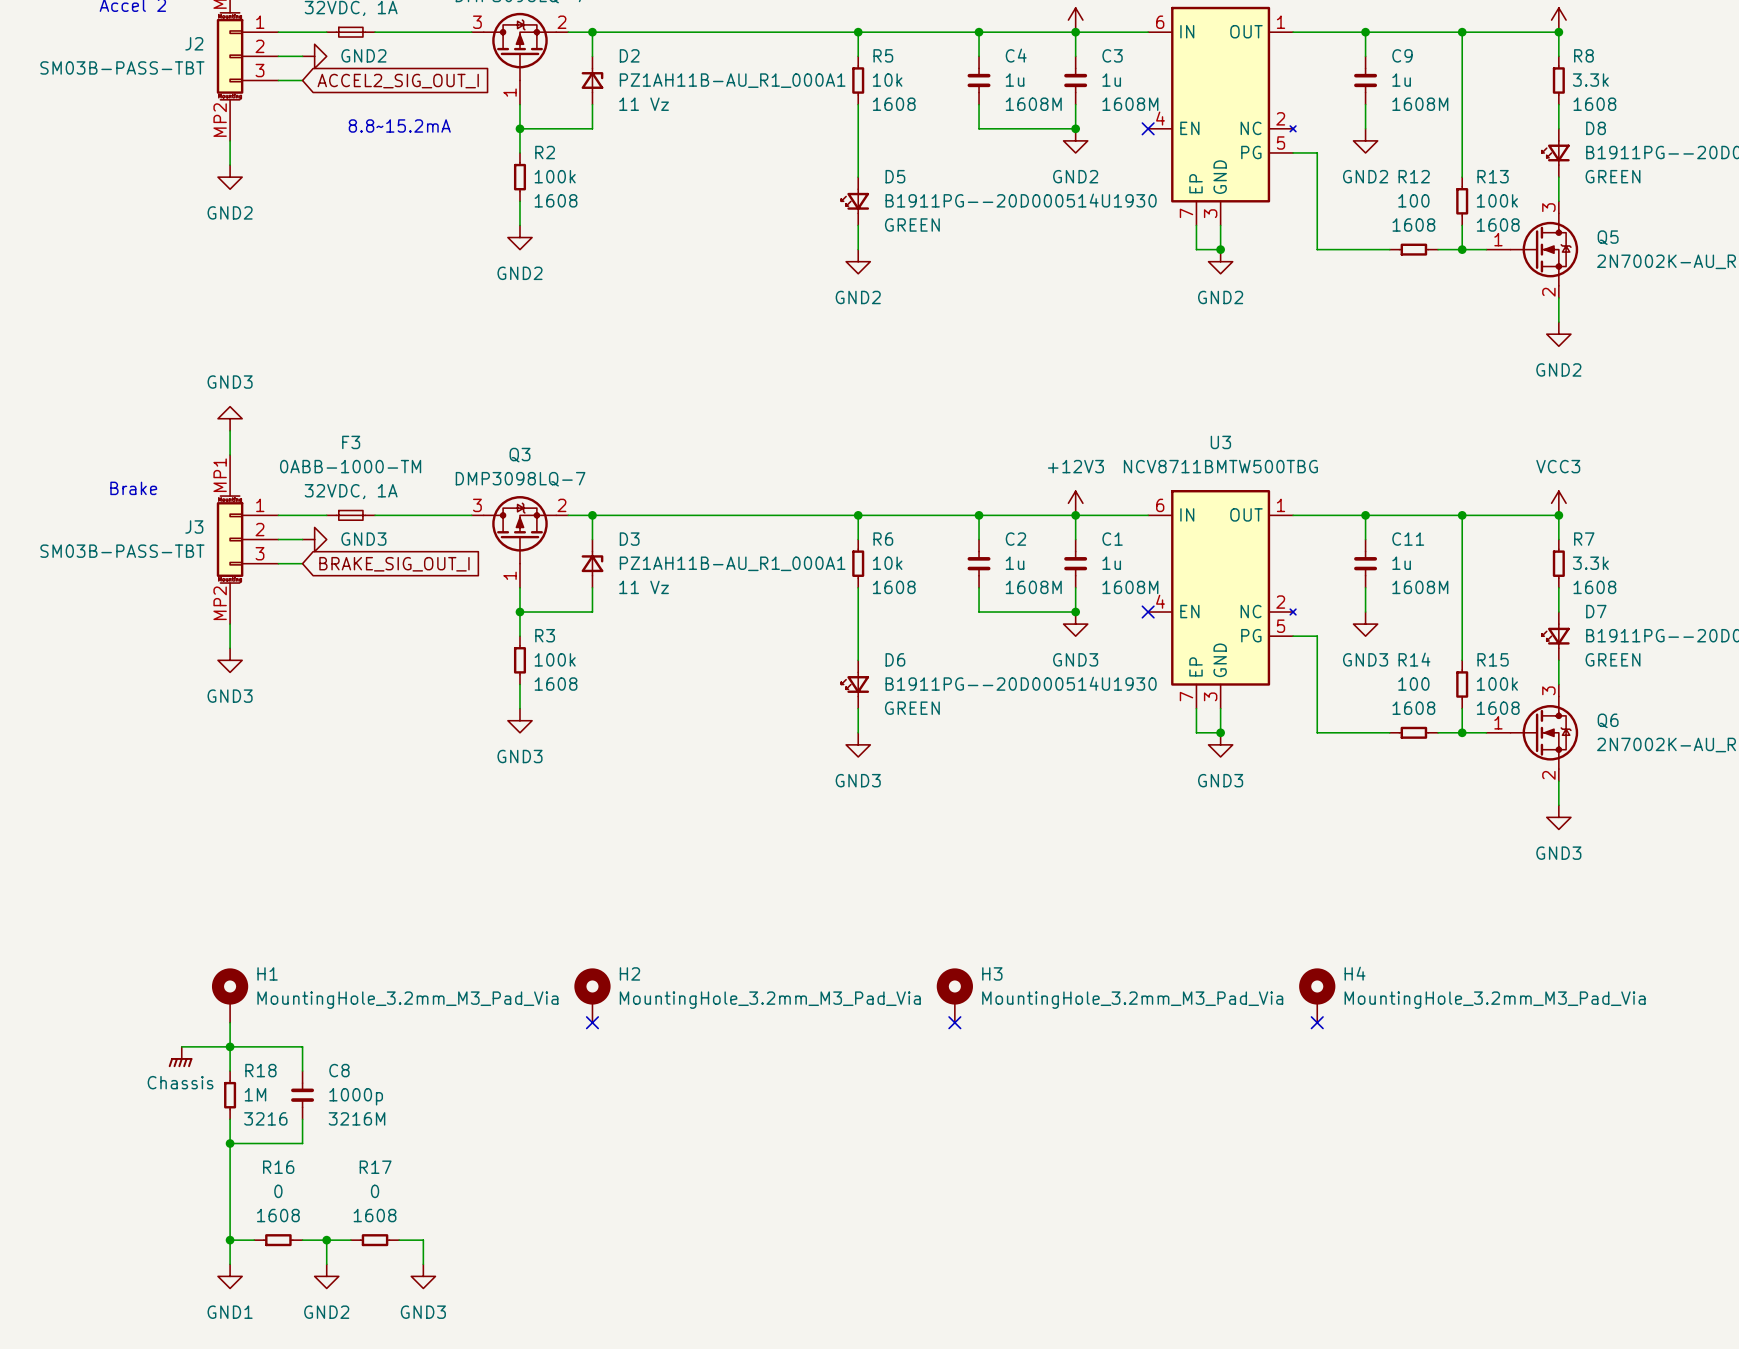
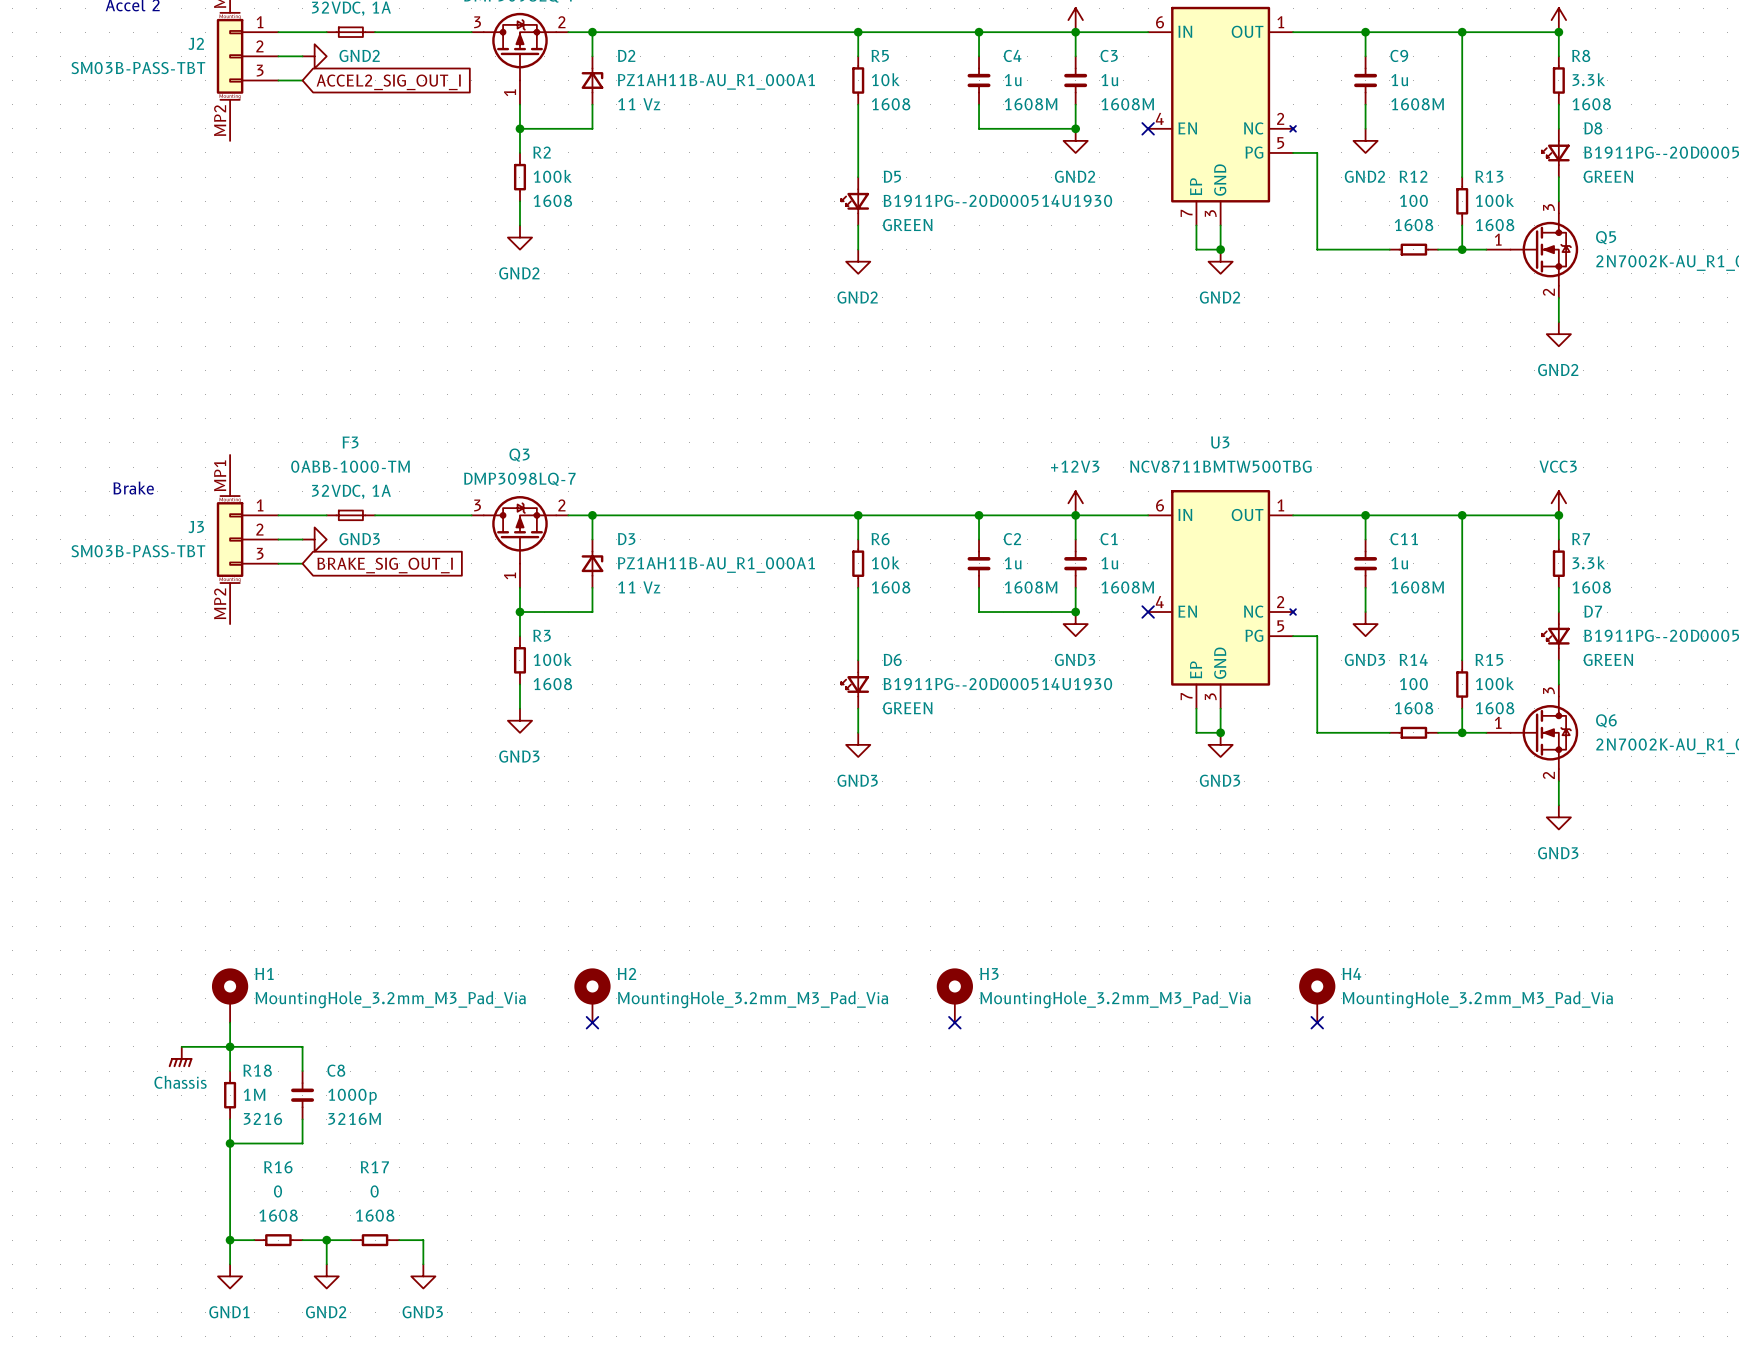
text: 8.8~15.2mA (399, 125) -> none
wire: (230, 140) (230, 165) -> none
power symbol: GND2 (230, 177) -> none
power symbol: GND3 (230, 418) -> none
wire: (230, 430) (230, 454) -> none
wire: (230, 624) (230, 648) -> none
power symbol: GND3 (230, 660) -> none

